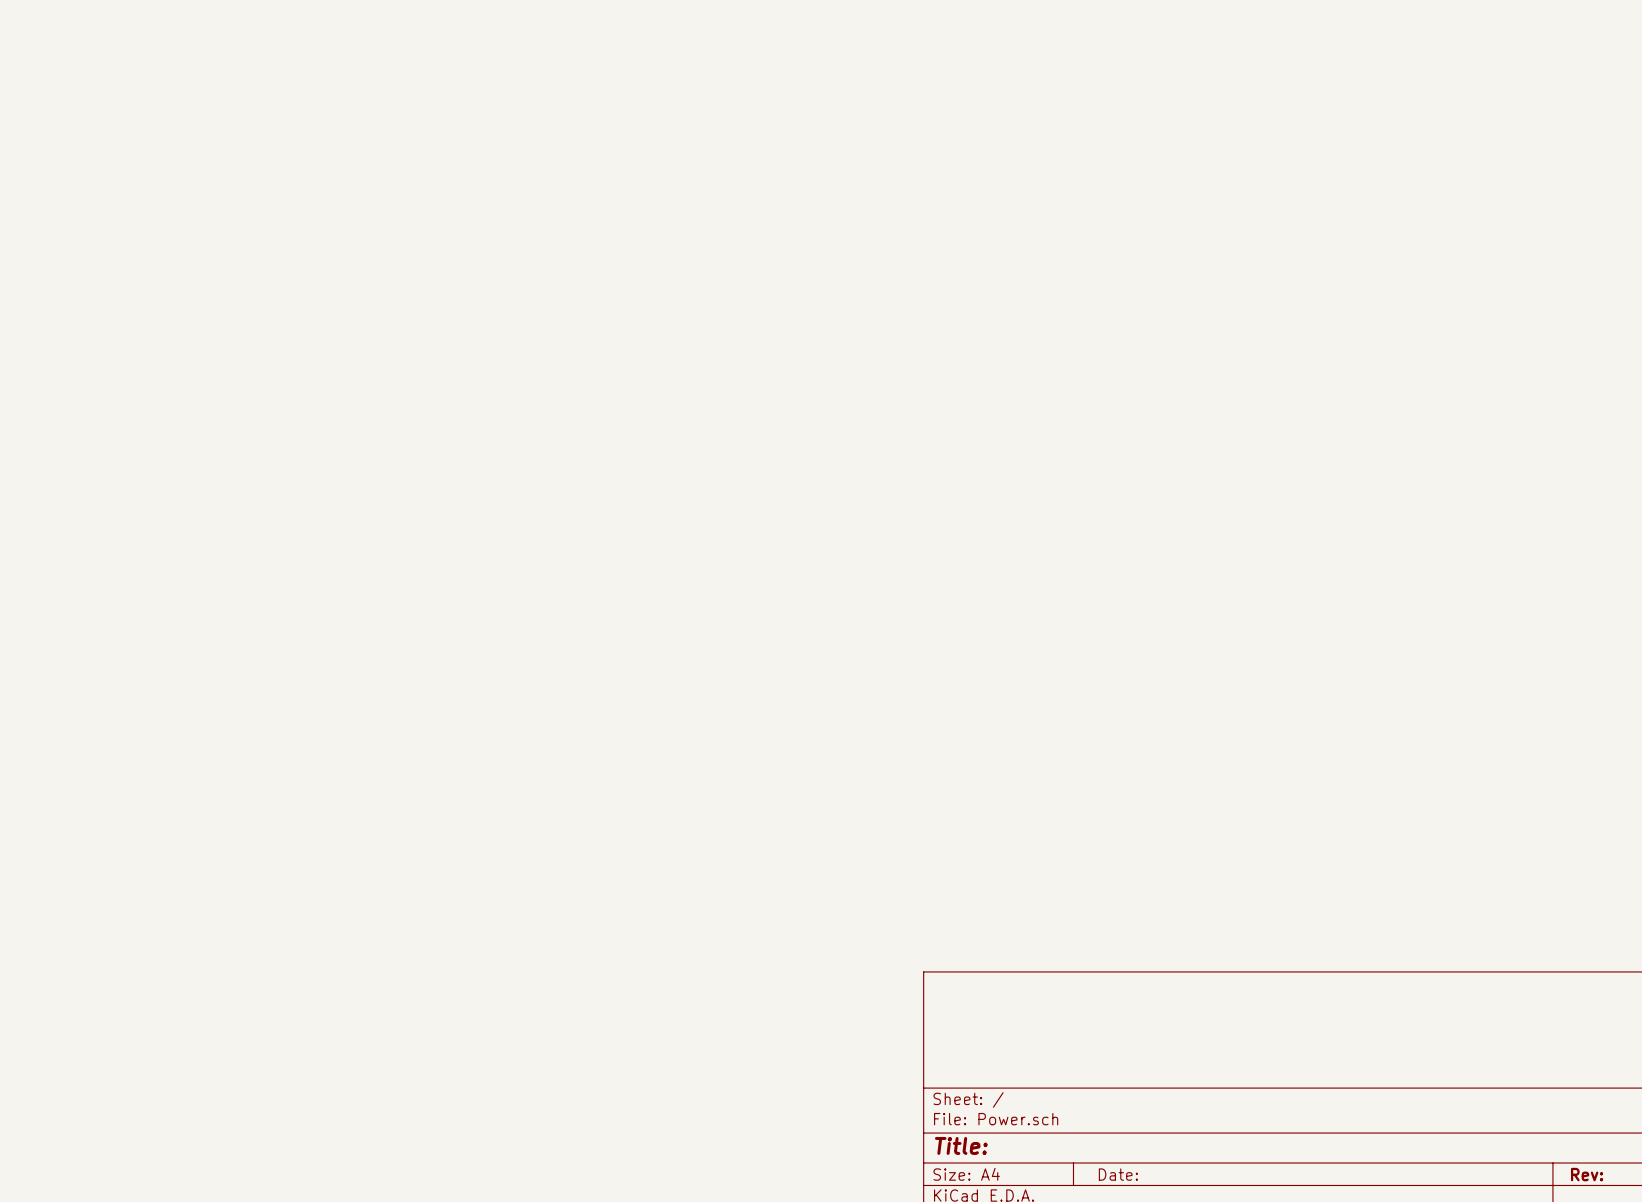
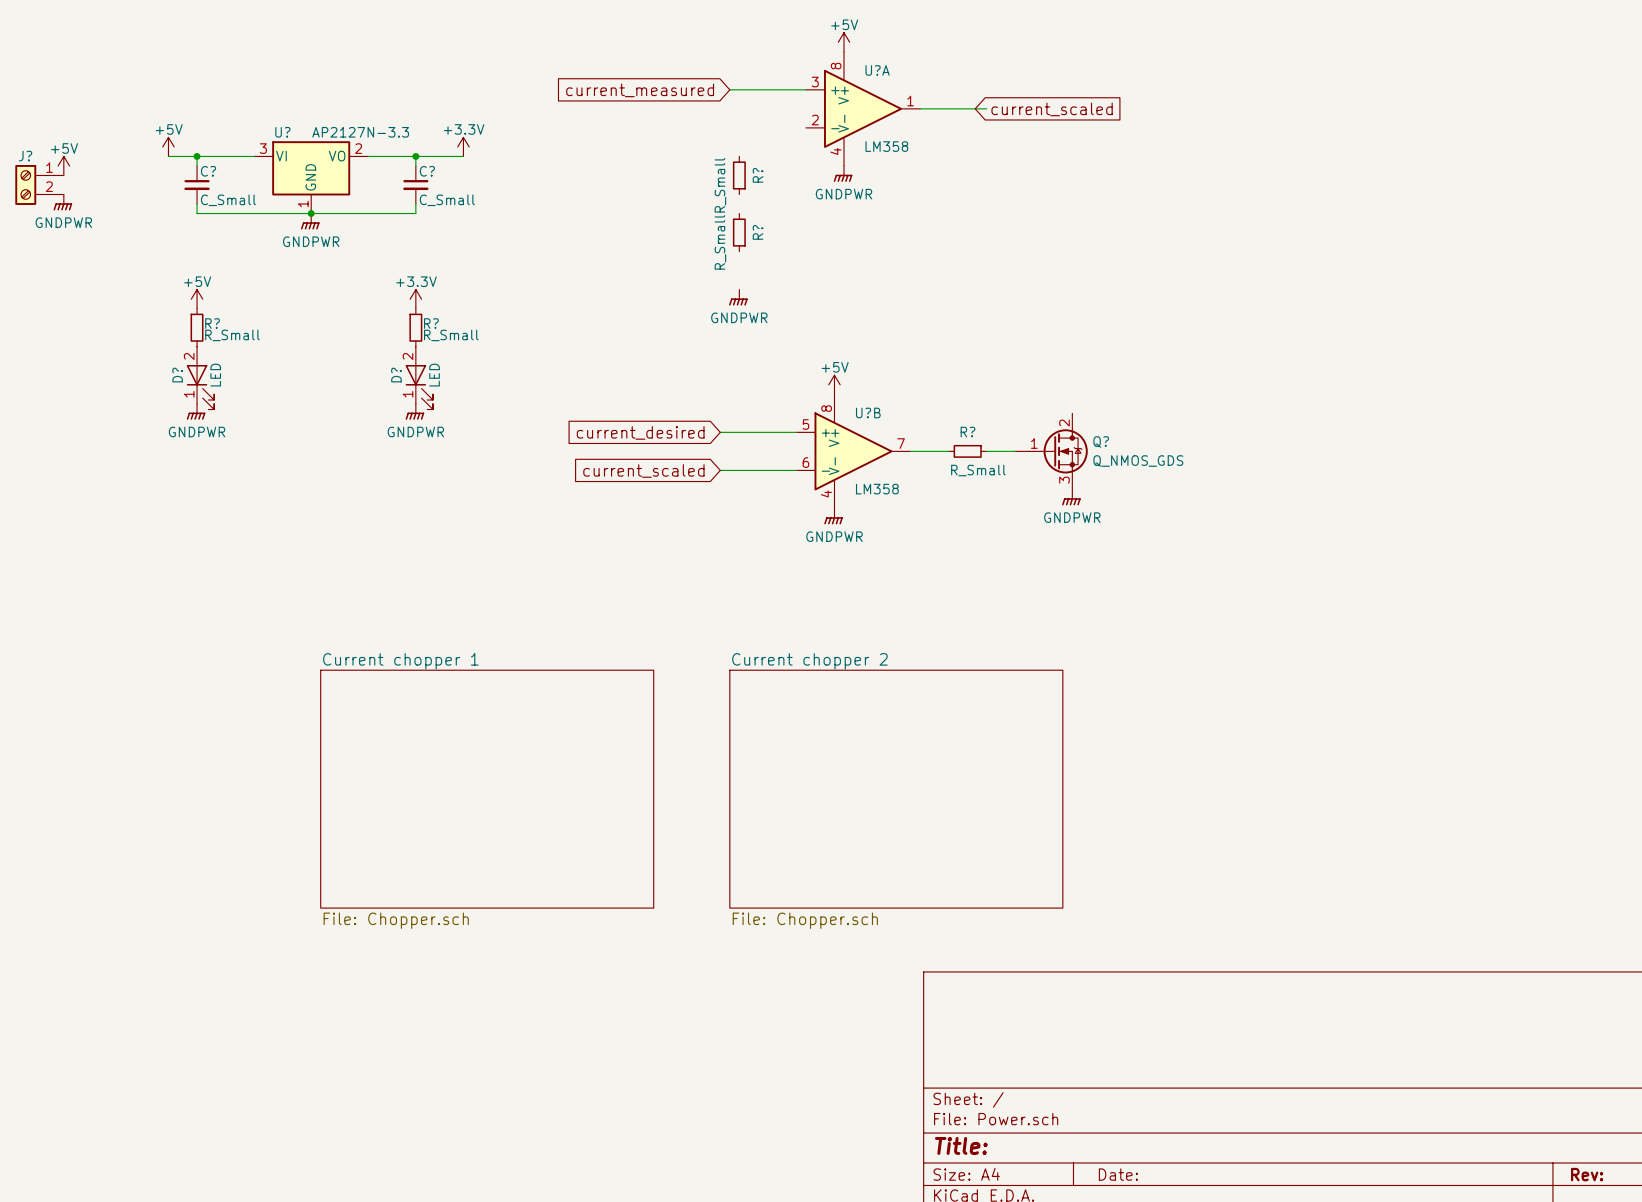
power symbol: none -> +5V (844, 42)
wire: none -> (729, 89) (805, 89)
global label: none -> current_measured (640, 90)
U?A: none -> LM358 (863, 108)
wire: none -> (920, 108) (986, 108)
global label: none -> current_scaled (1052, 109)
power symbol: none -> +5V (168, 146)
power symbol: none -> +3.3V (463, 146)
wire: none -> (168, 156) (254, 156)
wire: none -> (197, 156) (197, 165)
junction: none -> (197, 156)
wire: none -> (368, 156) (463, 156)
wire: none -> (415, 156) (415, 165)
junction: none -> (415, 156)
power symbol: none -> +5V (63, 165)
power symbol: none -> GNDPWR (843, 173)
R?: none -> R_Small (739, 175)
U?: none -> AP2127N-3.3 (311, 177)
J?: none -> (39, 184)
C?: none -> C_Small (197, 184)
C?: none -> C_Small (415, 184)
power symbol: none -> GNDPWR (62, 202)
wire: none -> (197, 204) (197, 213) (415, 213) (415, 204)
junction: none -> (311, 213)
power symbol: none -> GNDPWR (310, 221)
R?: none -> R_Small (739, 232)
power symbol: none -> GNDPWR (738, 297)
power symbol: none -> +5V (197, 299)
power symbol: none -> +3.3V (415, 299)
R?: none -> R_Small (197, 327)
R?: none -> R_Small (415, 327)
D?: none -> LED (200, 378)
D?: none -> LED (419, 378)
power symbol: none -> +5V (834, 384)
power symbol: none -> GNDPWR (196, 411)
power symbol: none -> GNDPWR (414, 411)
global label: none -> current_desired (640, 432)
wire: none -> (720, 432) (796, 432)
U?B: none -> LM358 (853, 451)
wire: none -> (910, 451) (948, 451)
R?: none -> R_Small (967, 451)
wire: none -> (986, 451) (1015, 451)
Q?: none -> Q_NMOS_GDS (1051, 451)
global label: none -> current_scaled (643, 470)
wire: none -> (720, 470) (796, 470)
power symbol: none -> GNDPWR (1071, 497)
power symbol: none -> GNDPWR (833, 516)
sheet Current chopper 1: none -> File: Chopper.sch (487, 789)
sheet Current chopper 2: none -> File: Chopper.sch (896, 789)

